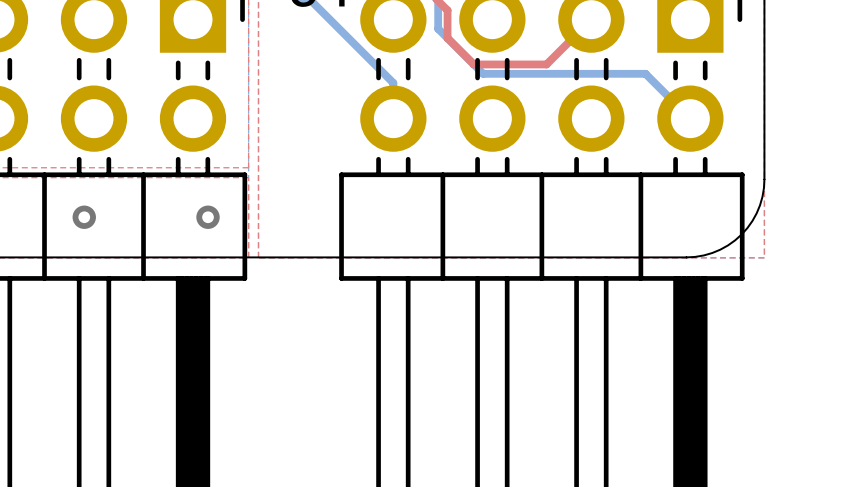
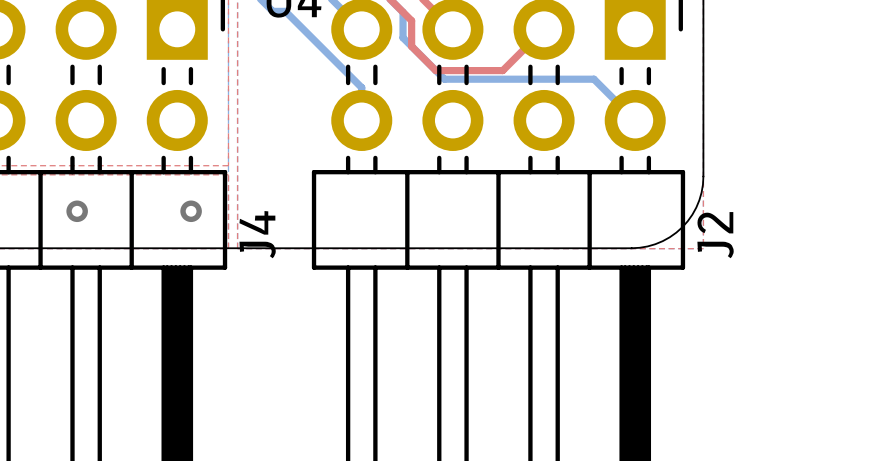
J4 name: none -> J4 (257, 234)
J2 name: none -> J2 (715, 235)

